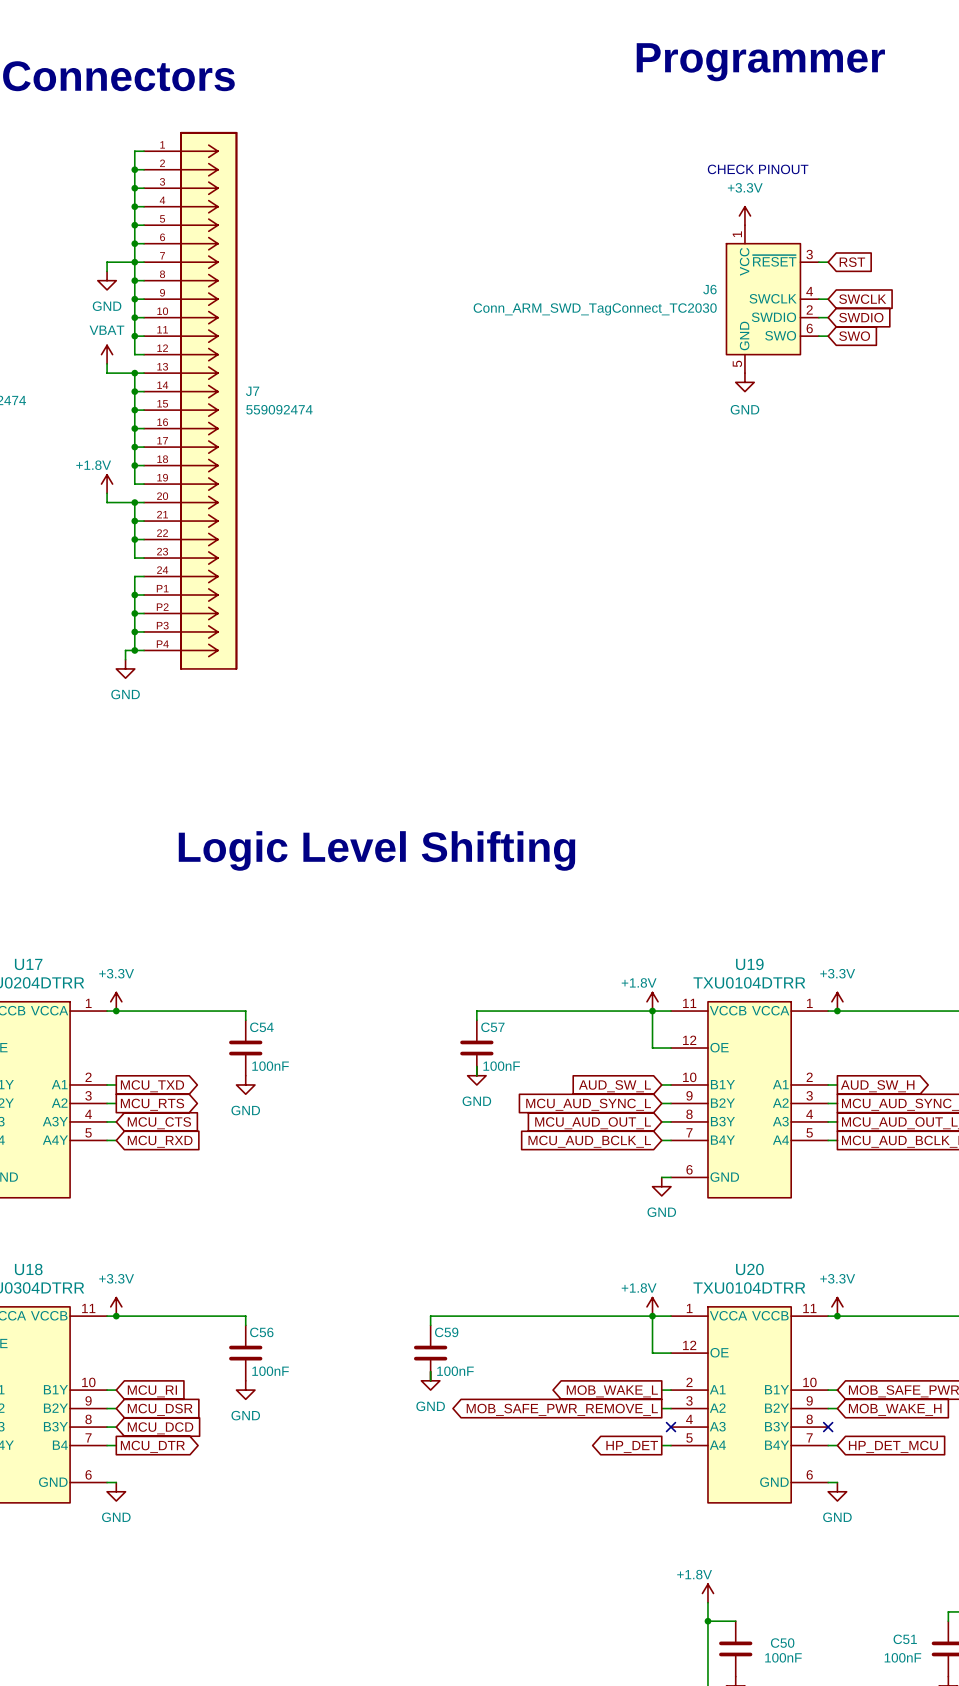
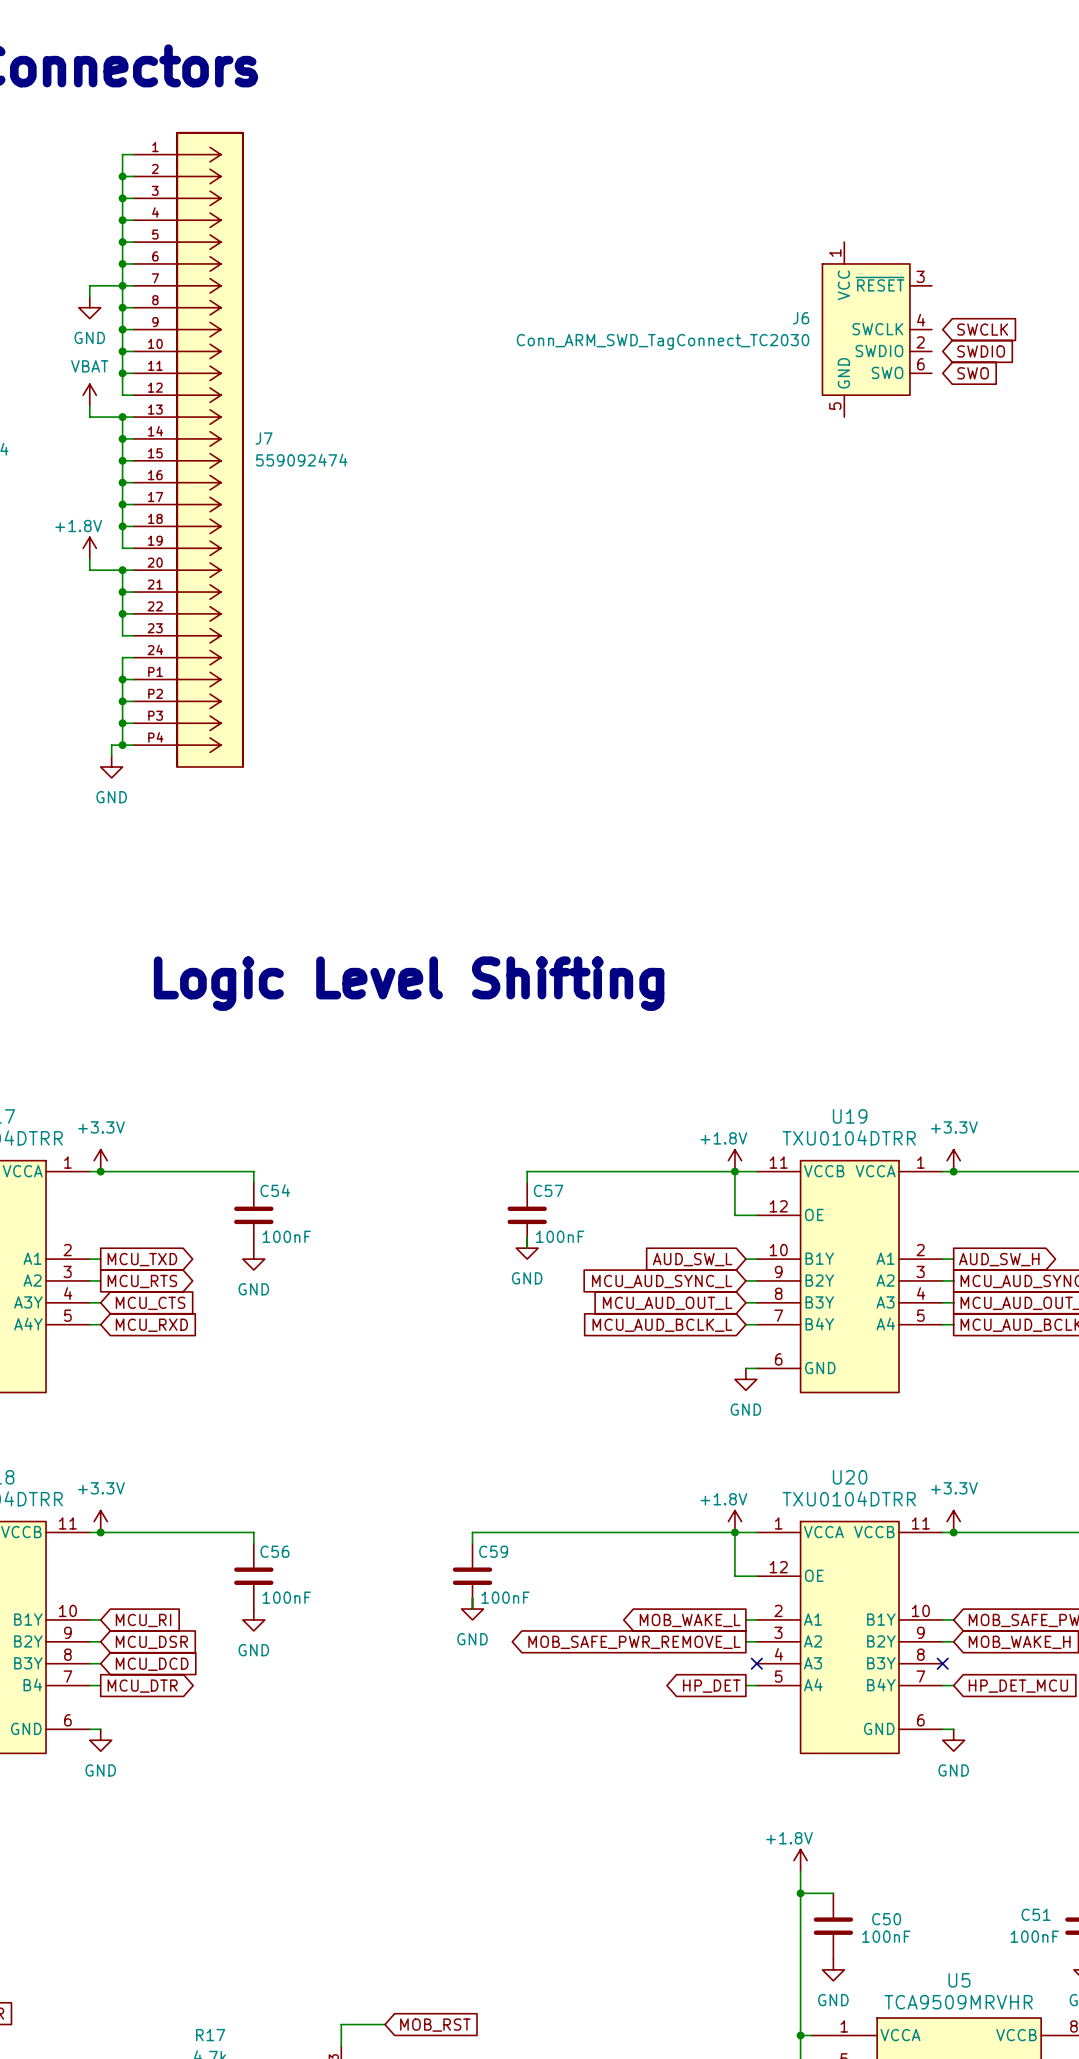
text: Programmer (760, 62) -> none
text: CHECK PINOUT (758, 169) -> none
power symbol: +3.3V (744, 215) -> none
wire: (818, 262) (828, 262) -> none
global label: RST (852, 262) -> none
wire: (818, 299) (828, 299) -> none
wire: (818, 317) (828, 317) -> none
wire: (818, 336) (828, 336) -> none
power symbol: GND (744, 382) -> none

